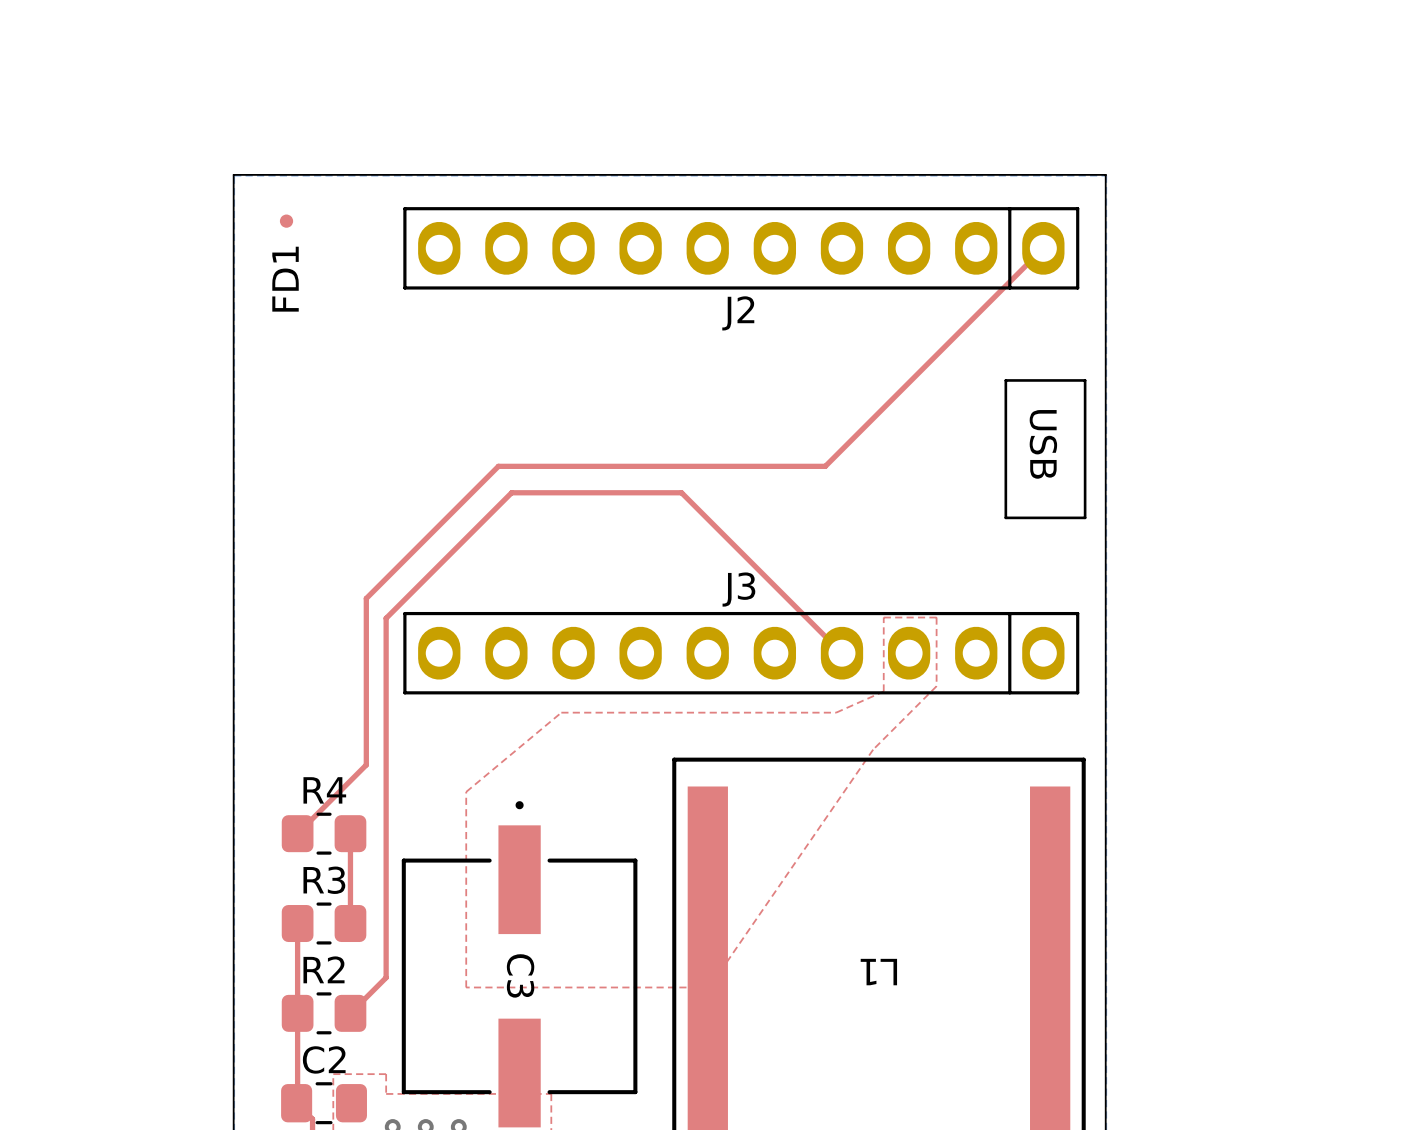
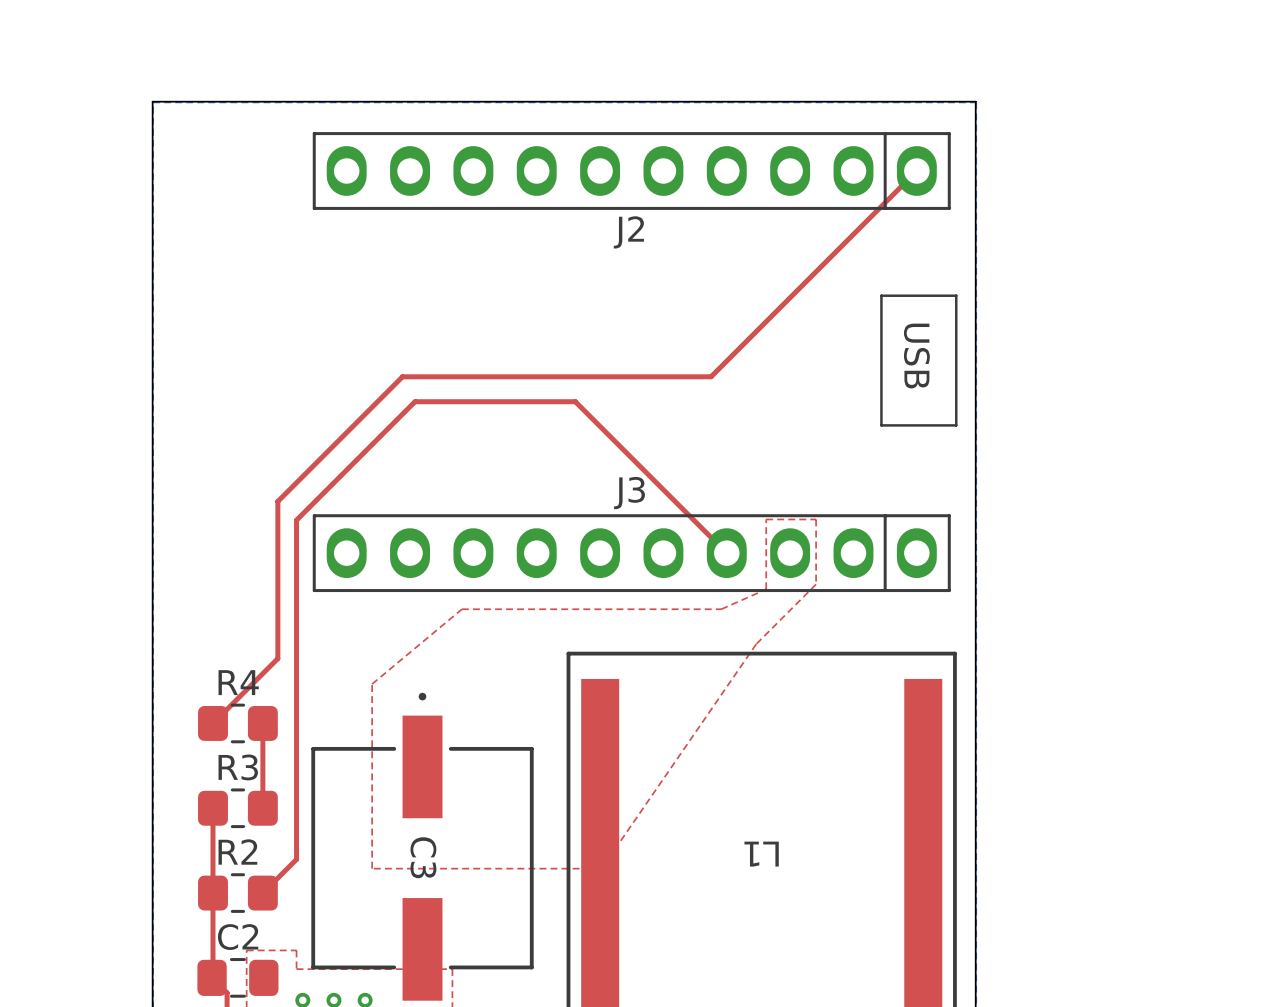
FD1: (286, 221) -> none

